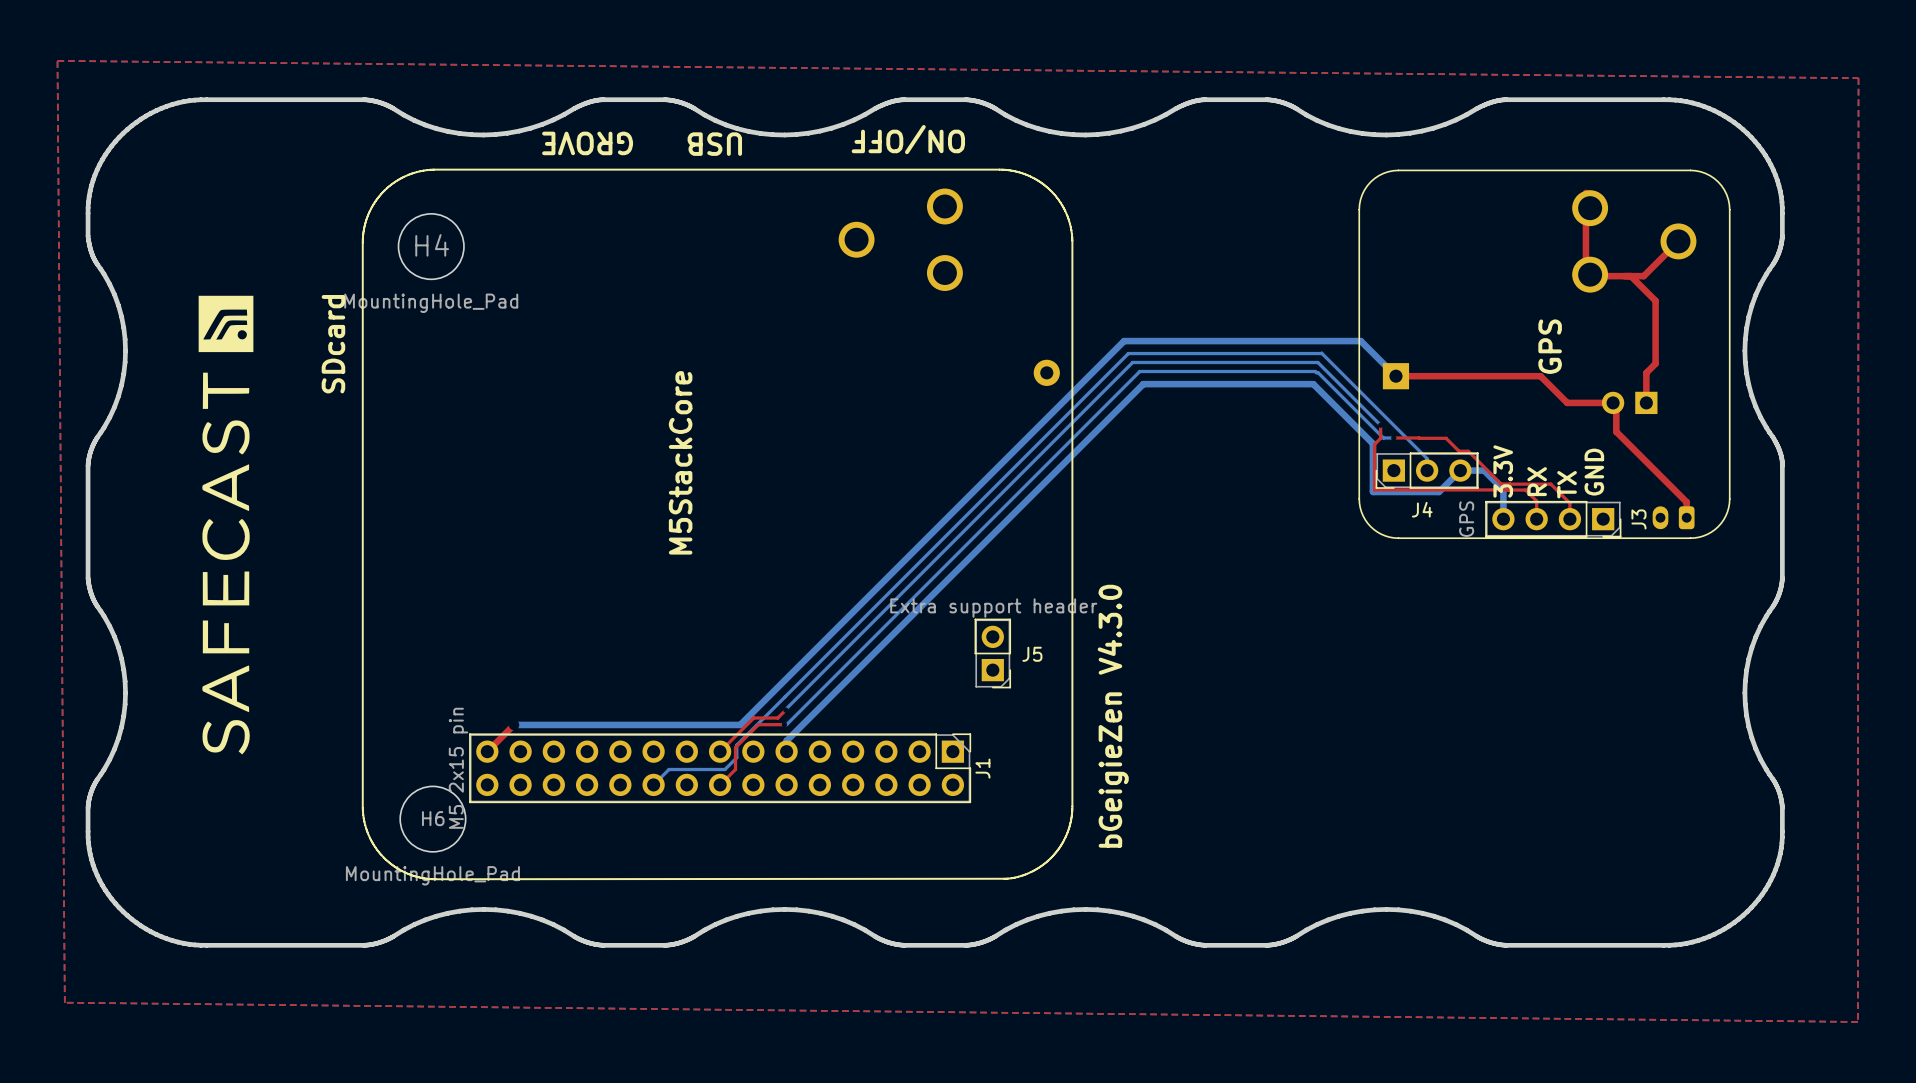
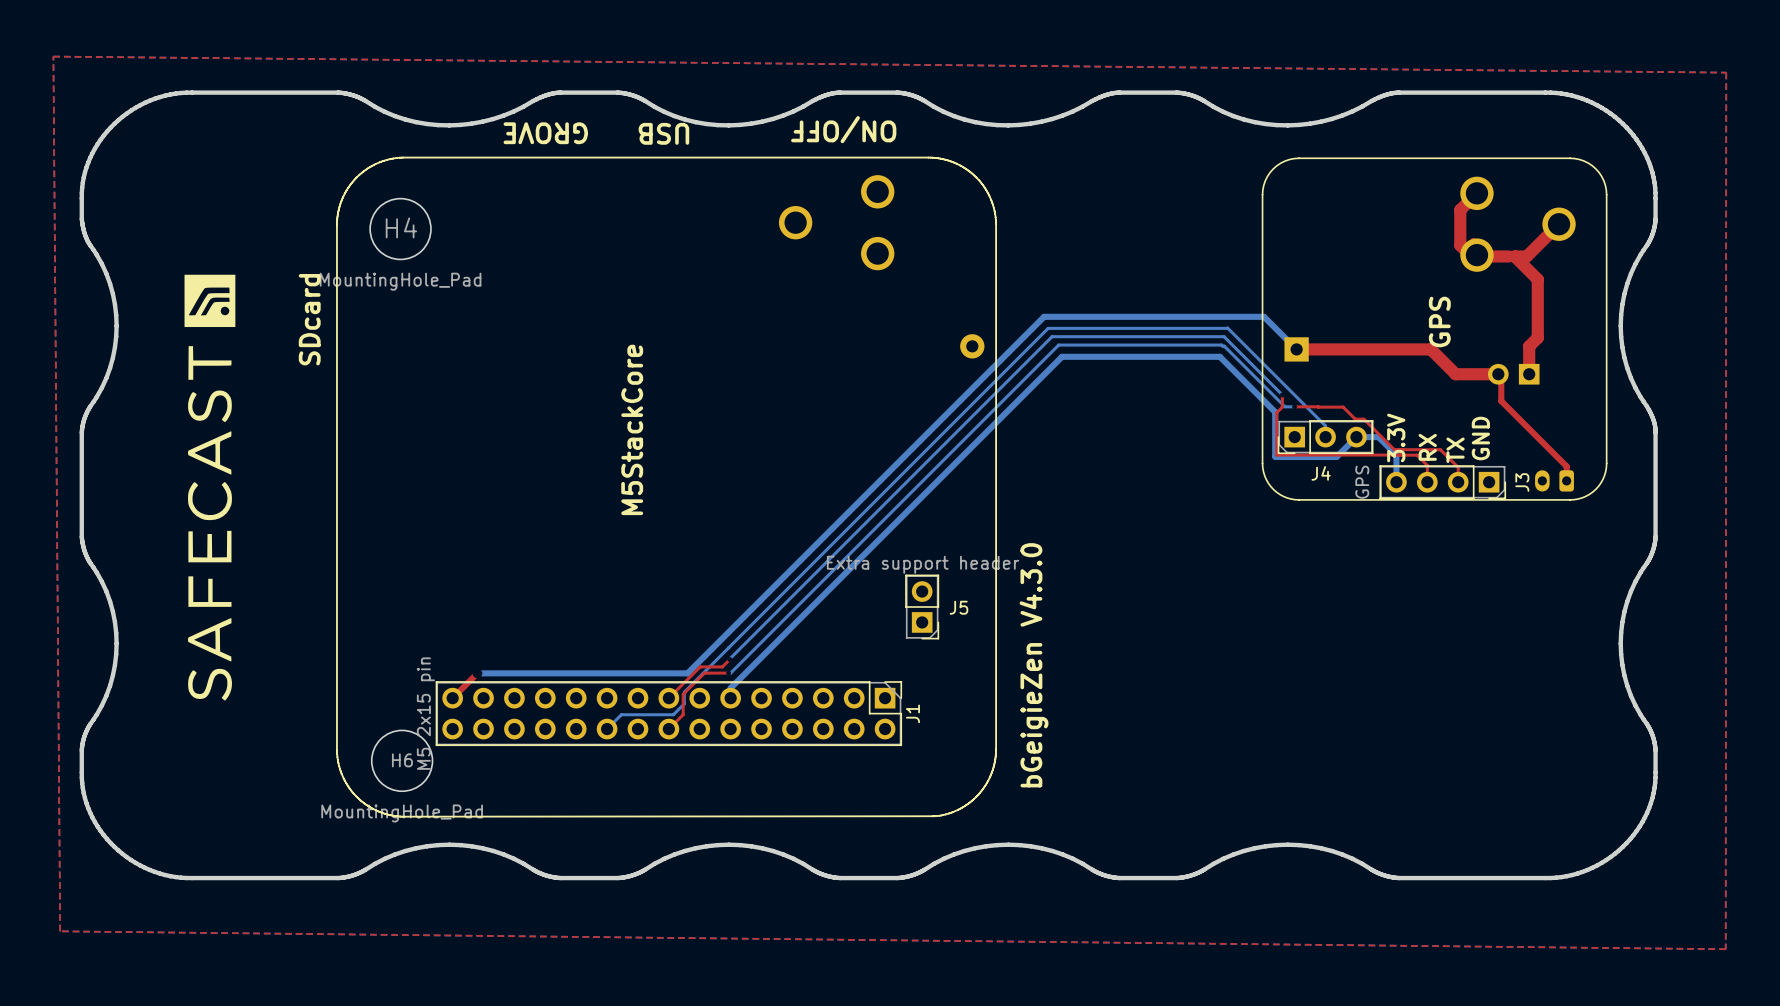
top track: (1585, 192) (1585, 259) -> none
top track: none -> (1476, 193) (1460, 210) (1460, 245) (1473, 258)
top track width: thin (1678, 241) (1643, 276) (1630, 276) (1655, 300) (1655, 363) (1646, 372) (1646, 402) -> thick (1559, 224) (1526, 256) (1514, 256) (1537, 279) (1537, 337) (1529, 346) (1529, 374)
top track width: thin (1602, 276) (1624, 276) -> thick (1488, 256) (1508, 256)
top track width: thin (1395, 376) (1540, 376) (1567, 402) (1613, 402) -> thick (1296, 349) (1430, 349) (1455, 374) (1498, 374)

